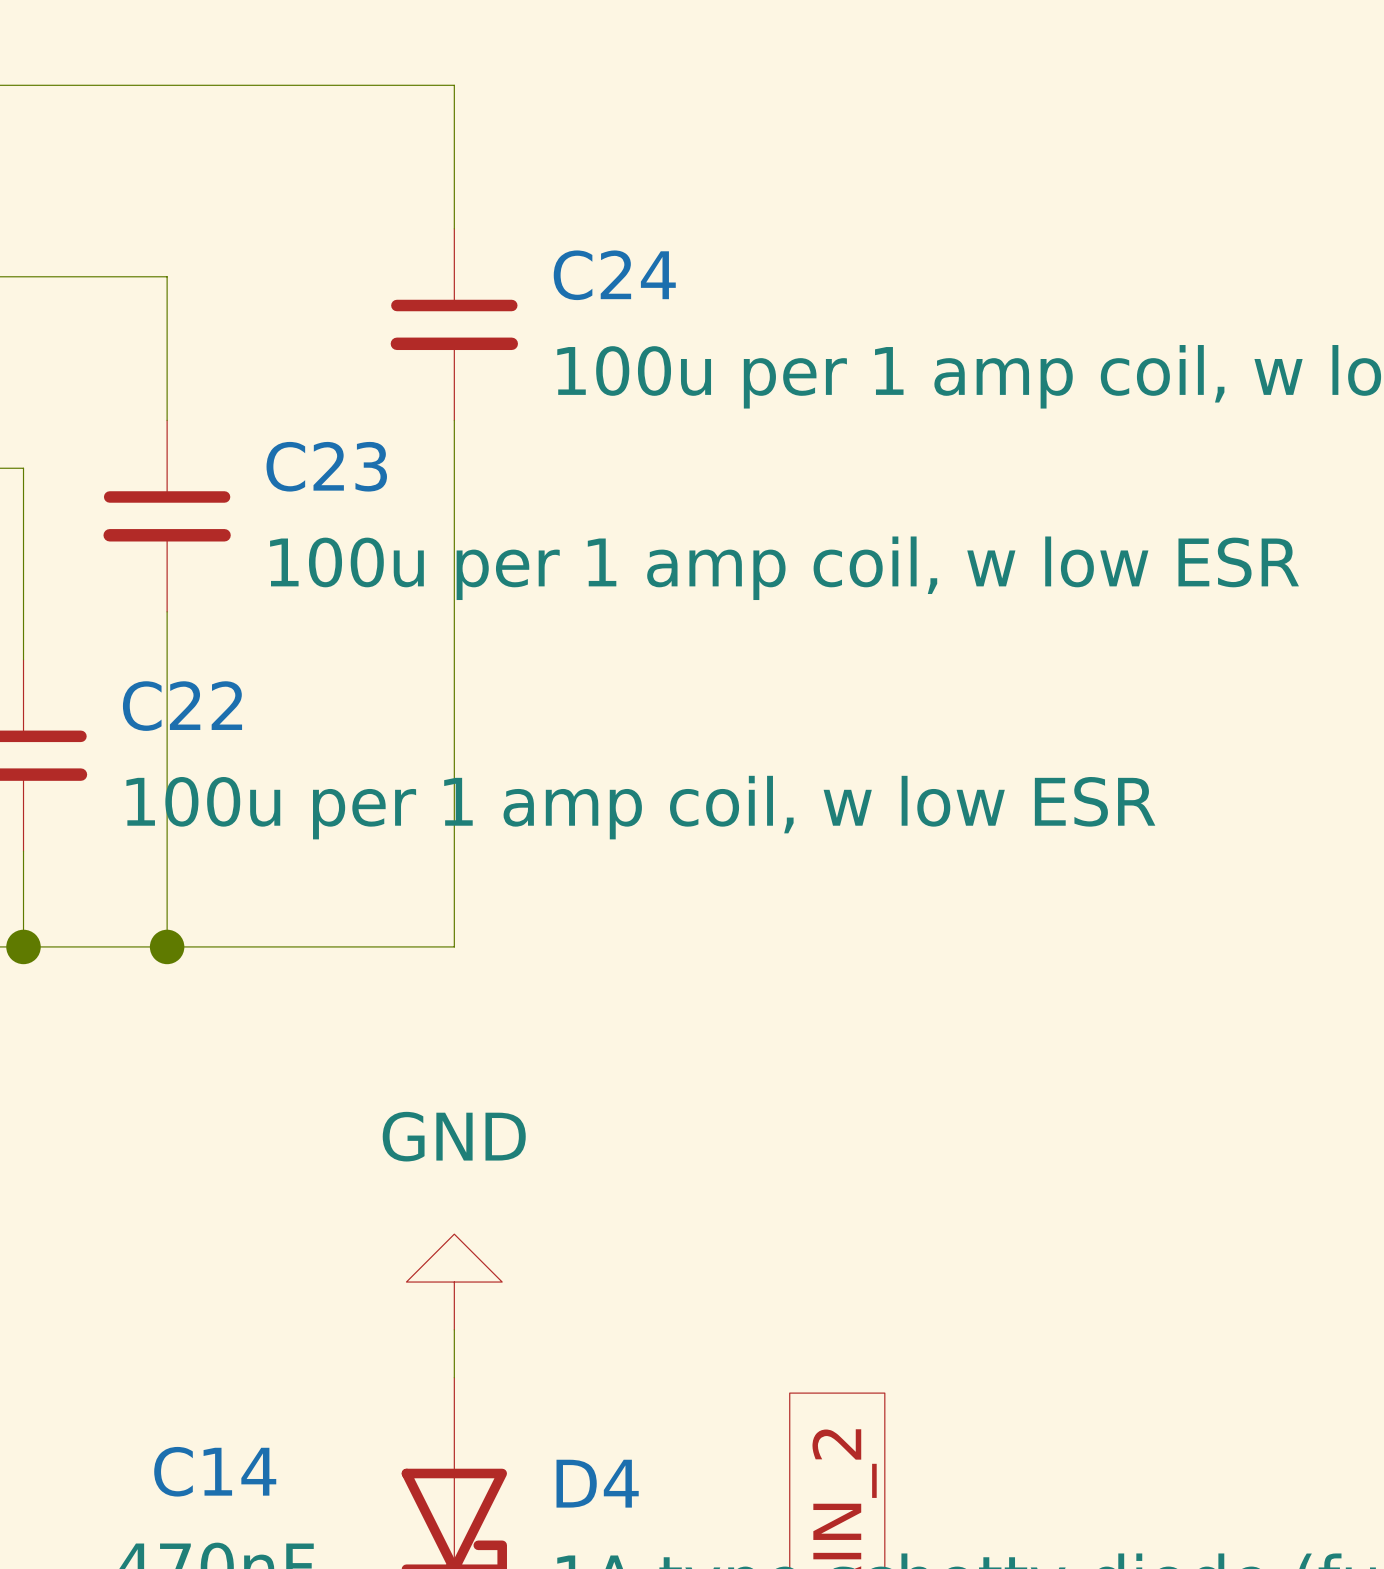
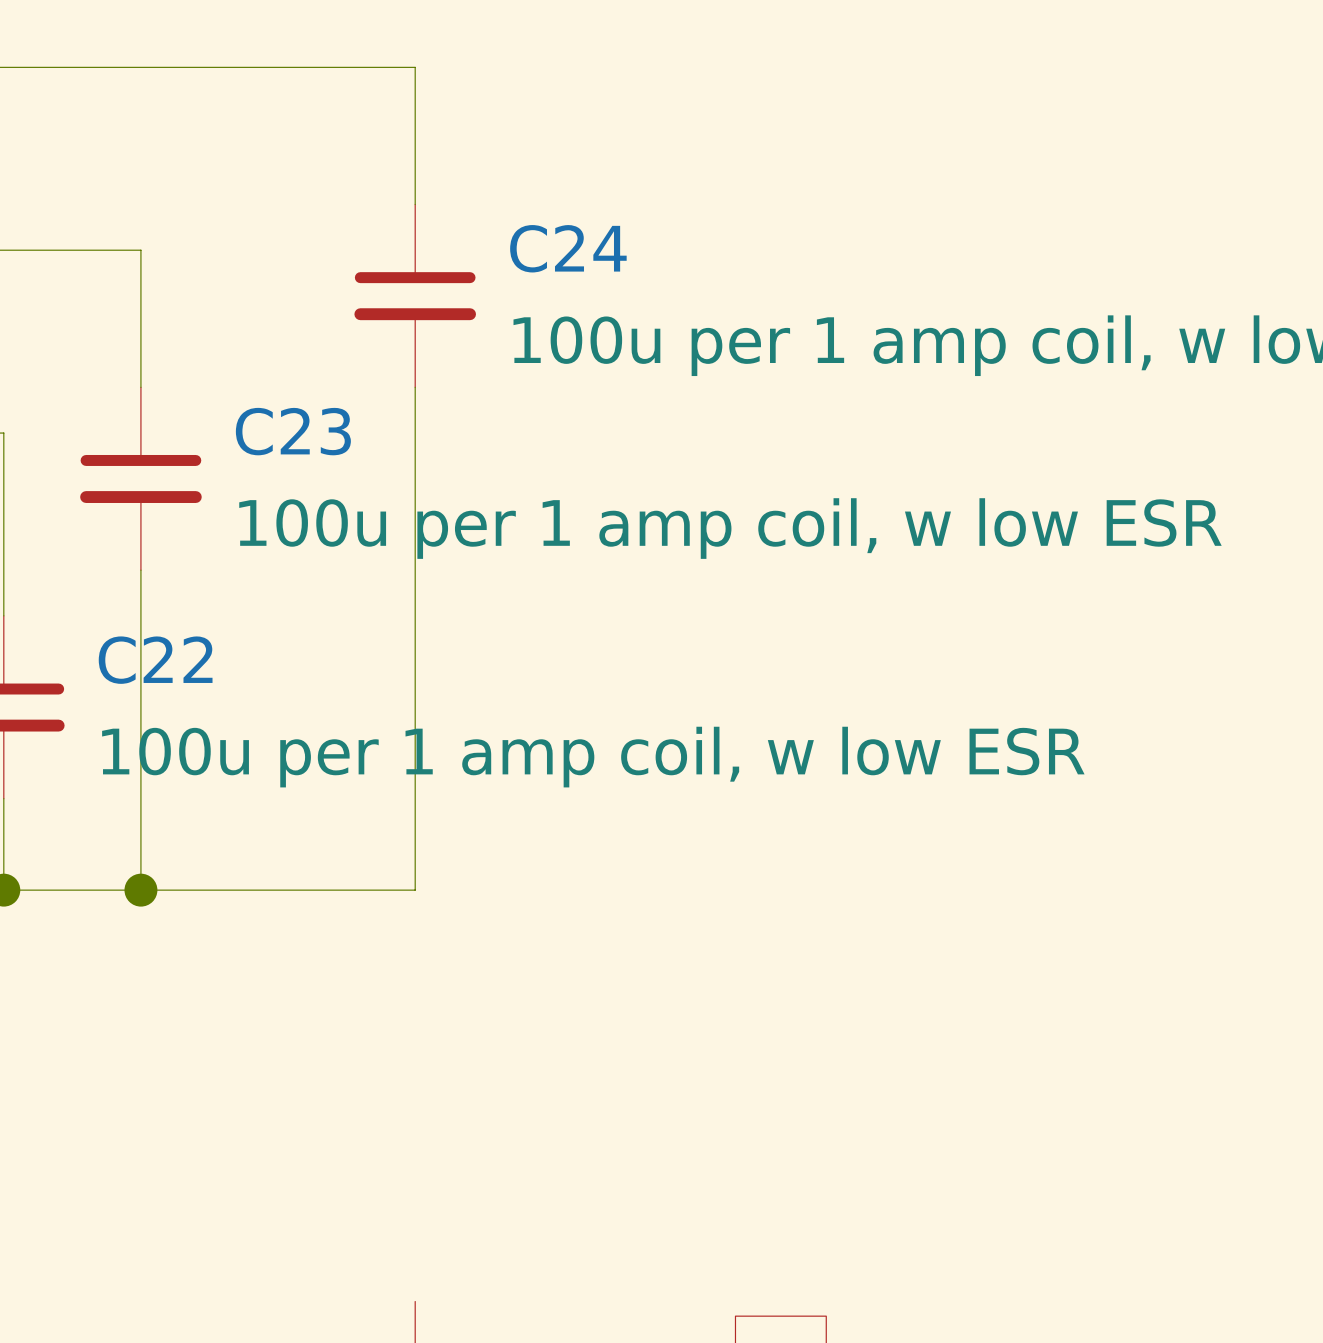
power symbol: GND (454, 1282) -> none
wire: (454, 1329) (454, 1377) -> none

